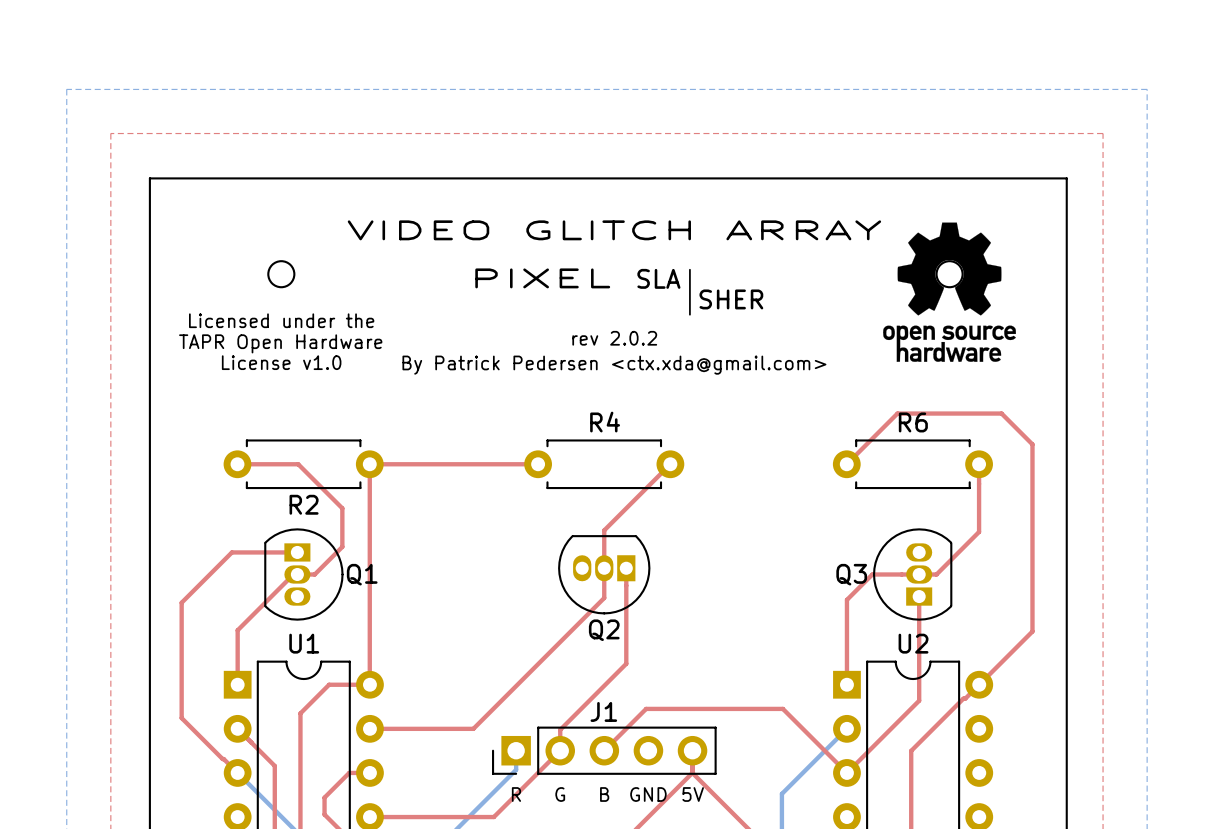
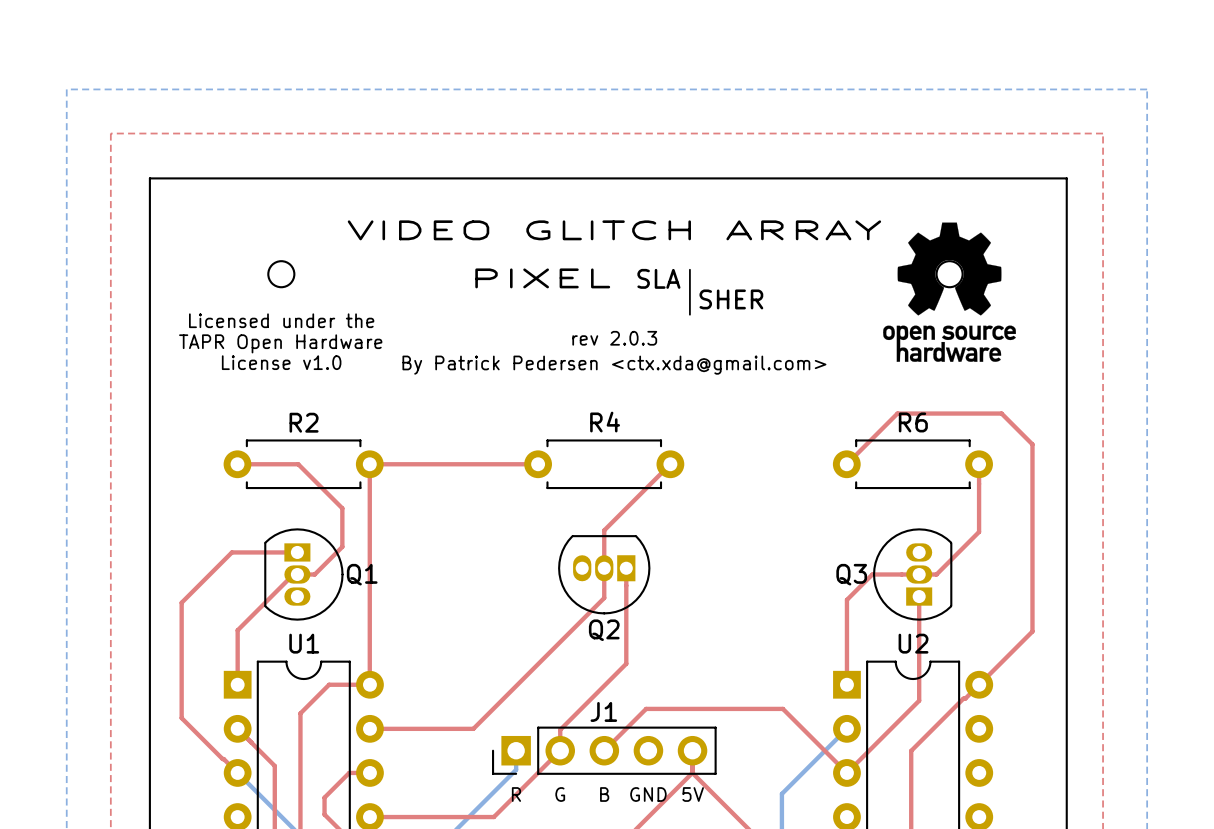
text: rev 2.0.2 (614, 338) -> rev 2.0.3 (614, 338)
R2 name position: R2 (304, 504) -> R2 (304, 422)

